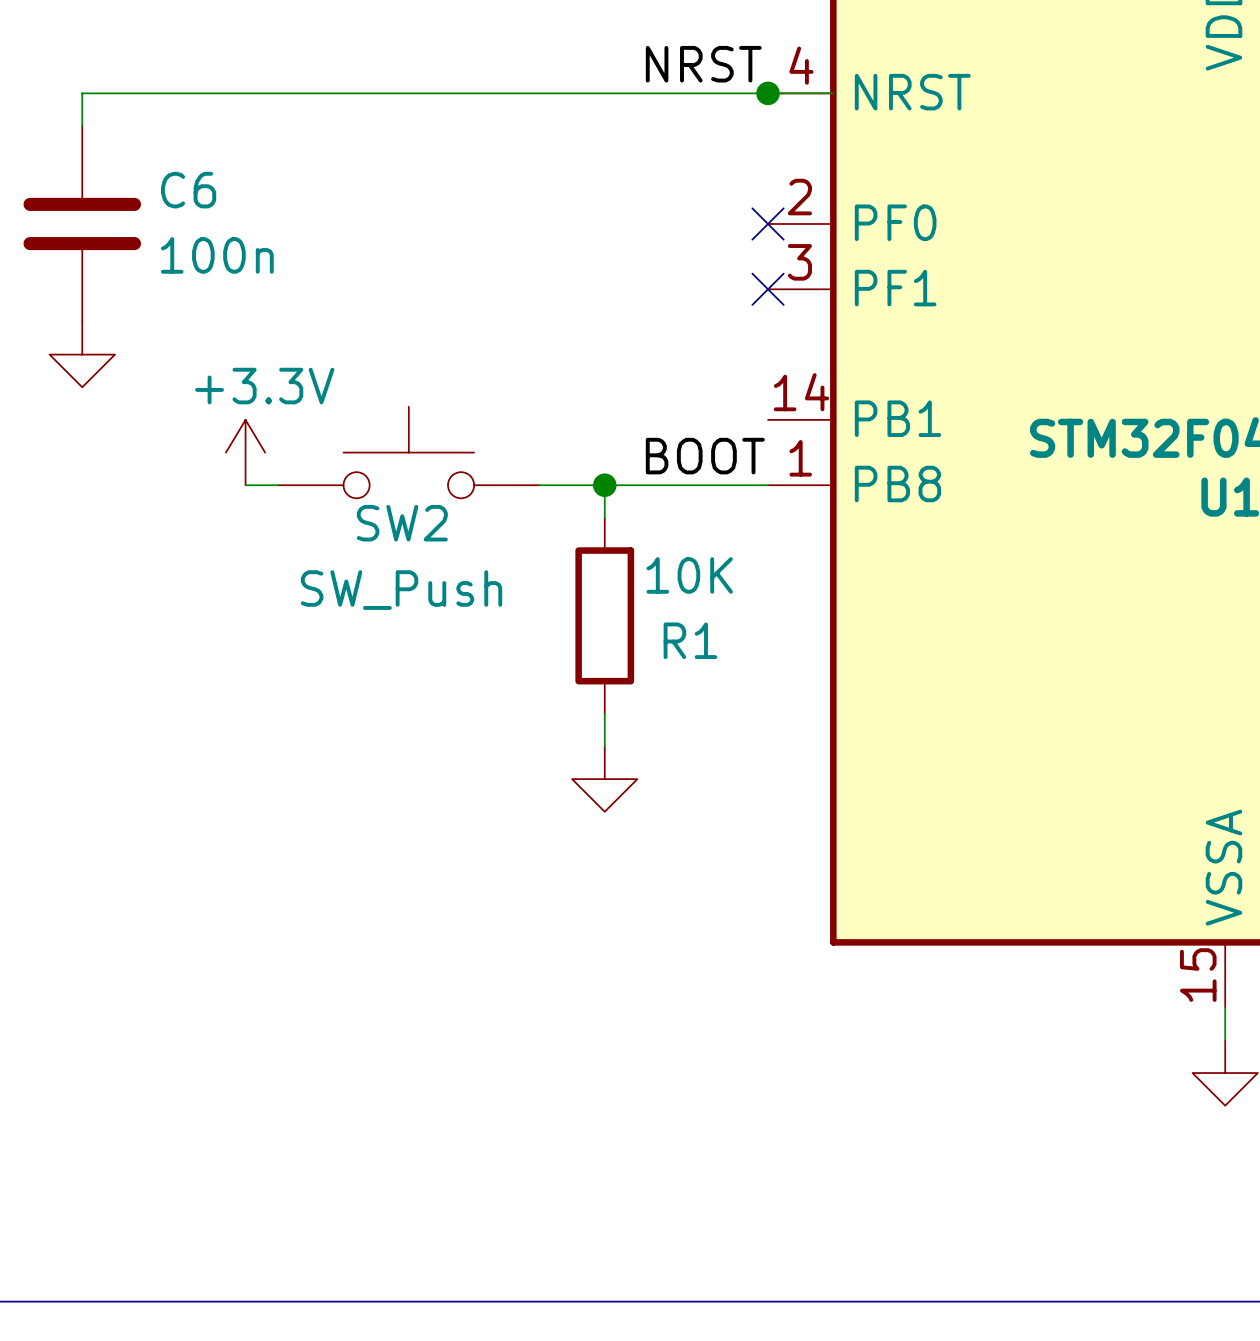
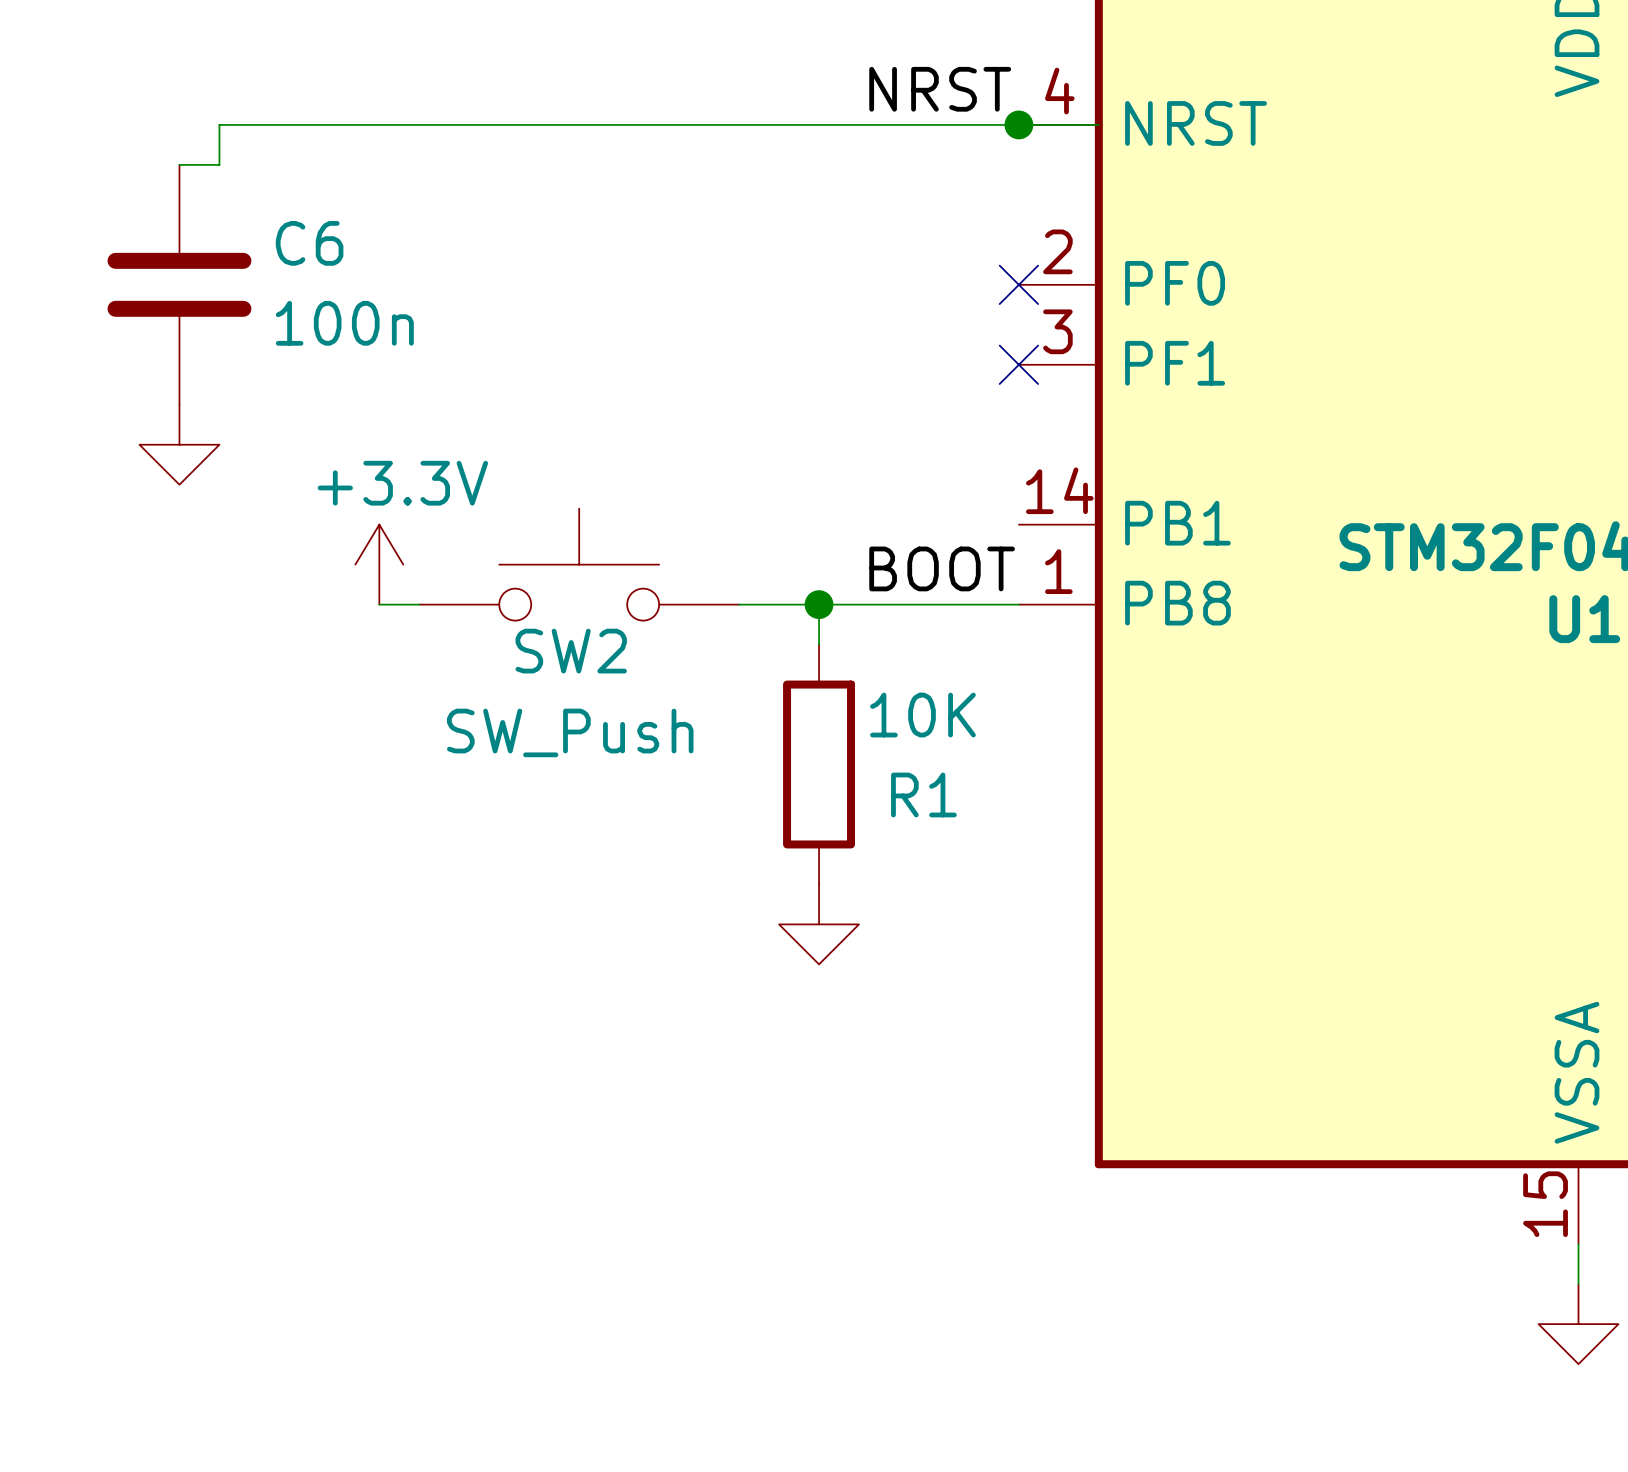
wire: (114, 93) (82, 93) (82, 126) -> (219, 124) (219, 164) (179, 164)
power symbol position: (604, 779) -> (819, 924)

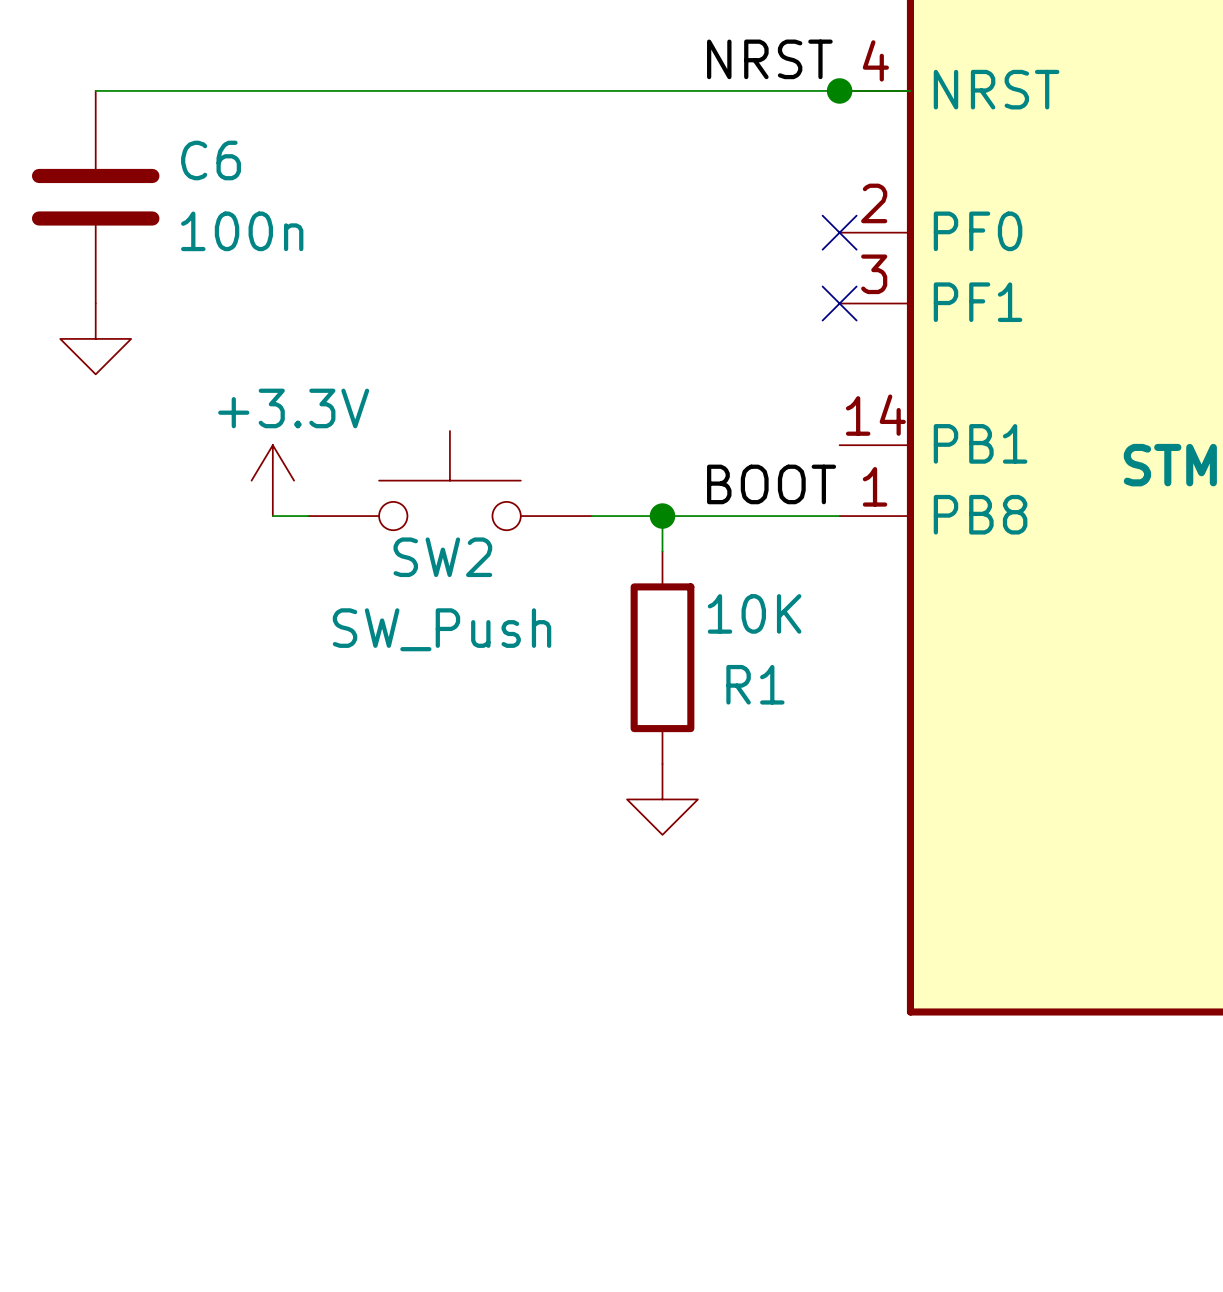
wire: (219, 124) (219, 164) (179, 164) -> (131, 90) (95, 90)
C6 position: (179, 284) -> (95, 197)
power symbol position: (179, 444) -> (95, 338)

